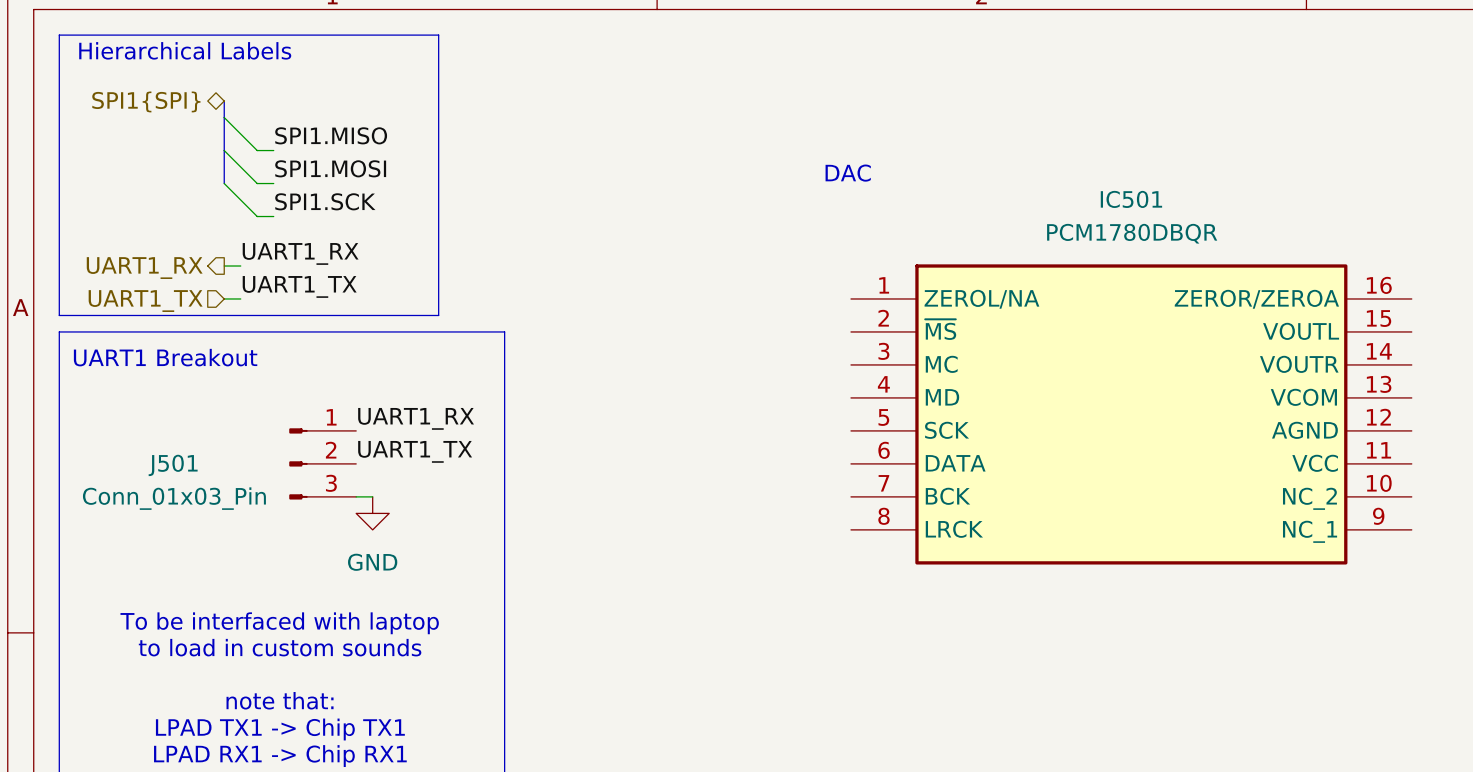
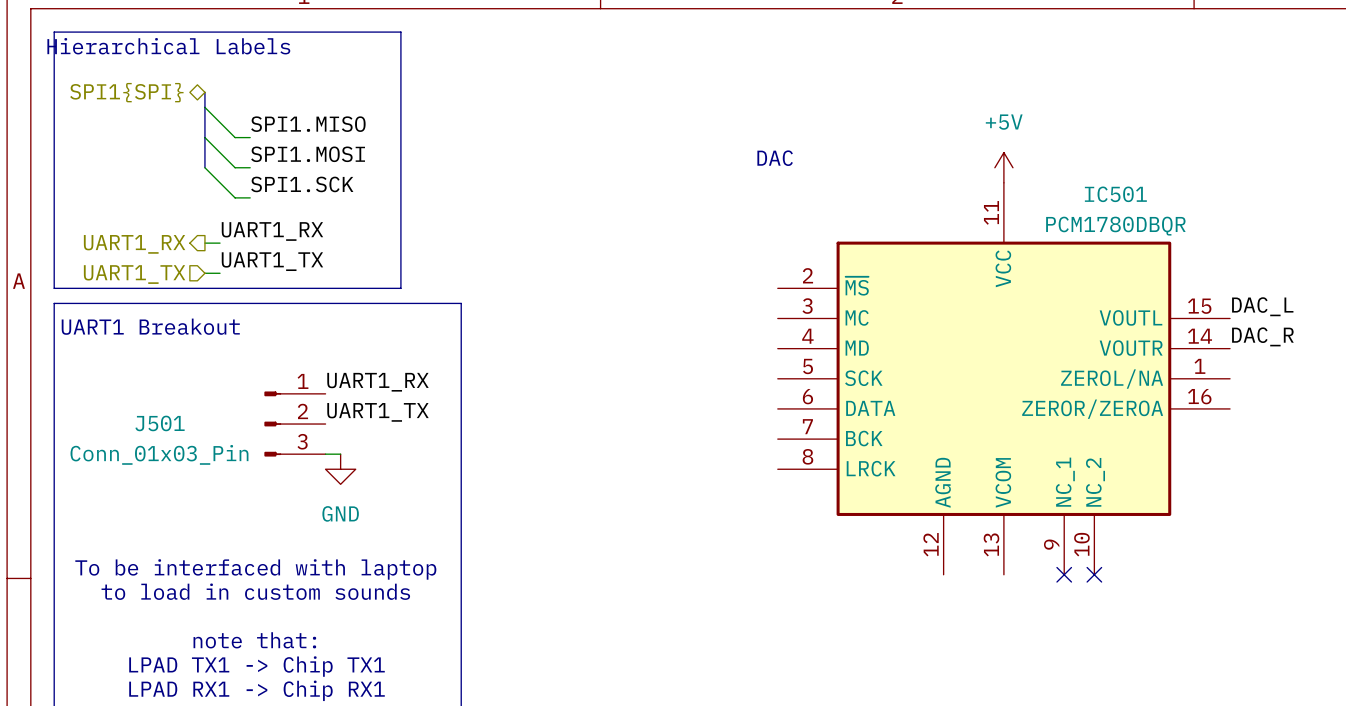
power symbol: none -> +5V (1003, 167)
IC501 name position: IC501 (1131, 199) -> IC501 (1115, 194)
IC501 value position: PCM1780DBQR (1132, 233) -> PCM1780DBQR (1115, 226)
IC501 symbol: [850, 264, 1412, 565] -> [777, 182, 1231, 575]
label: none -> DAC_L (1262, 306)
label: none -> DAC_R (1262, 336)
no-connect mark: none -> (1064, 574)
no-connect mark: none -> (1094, 574)

